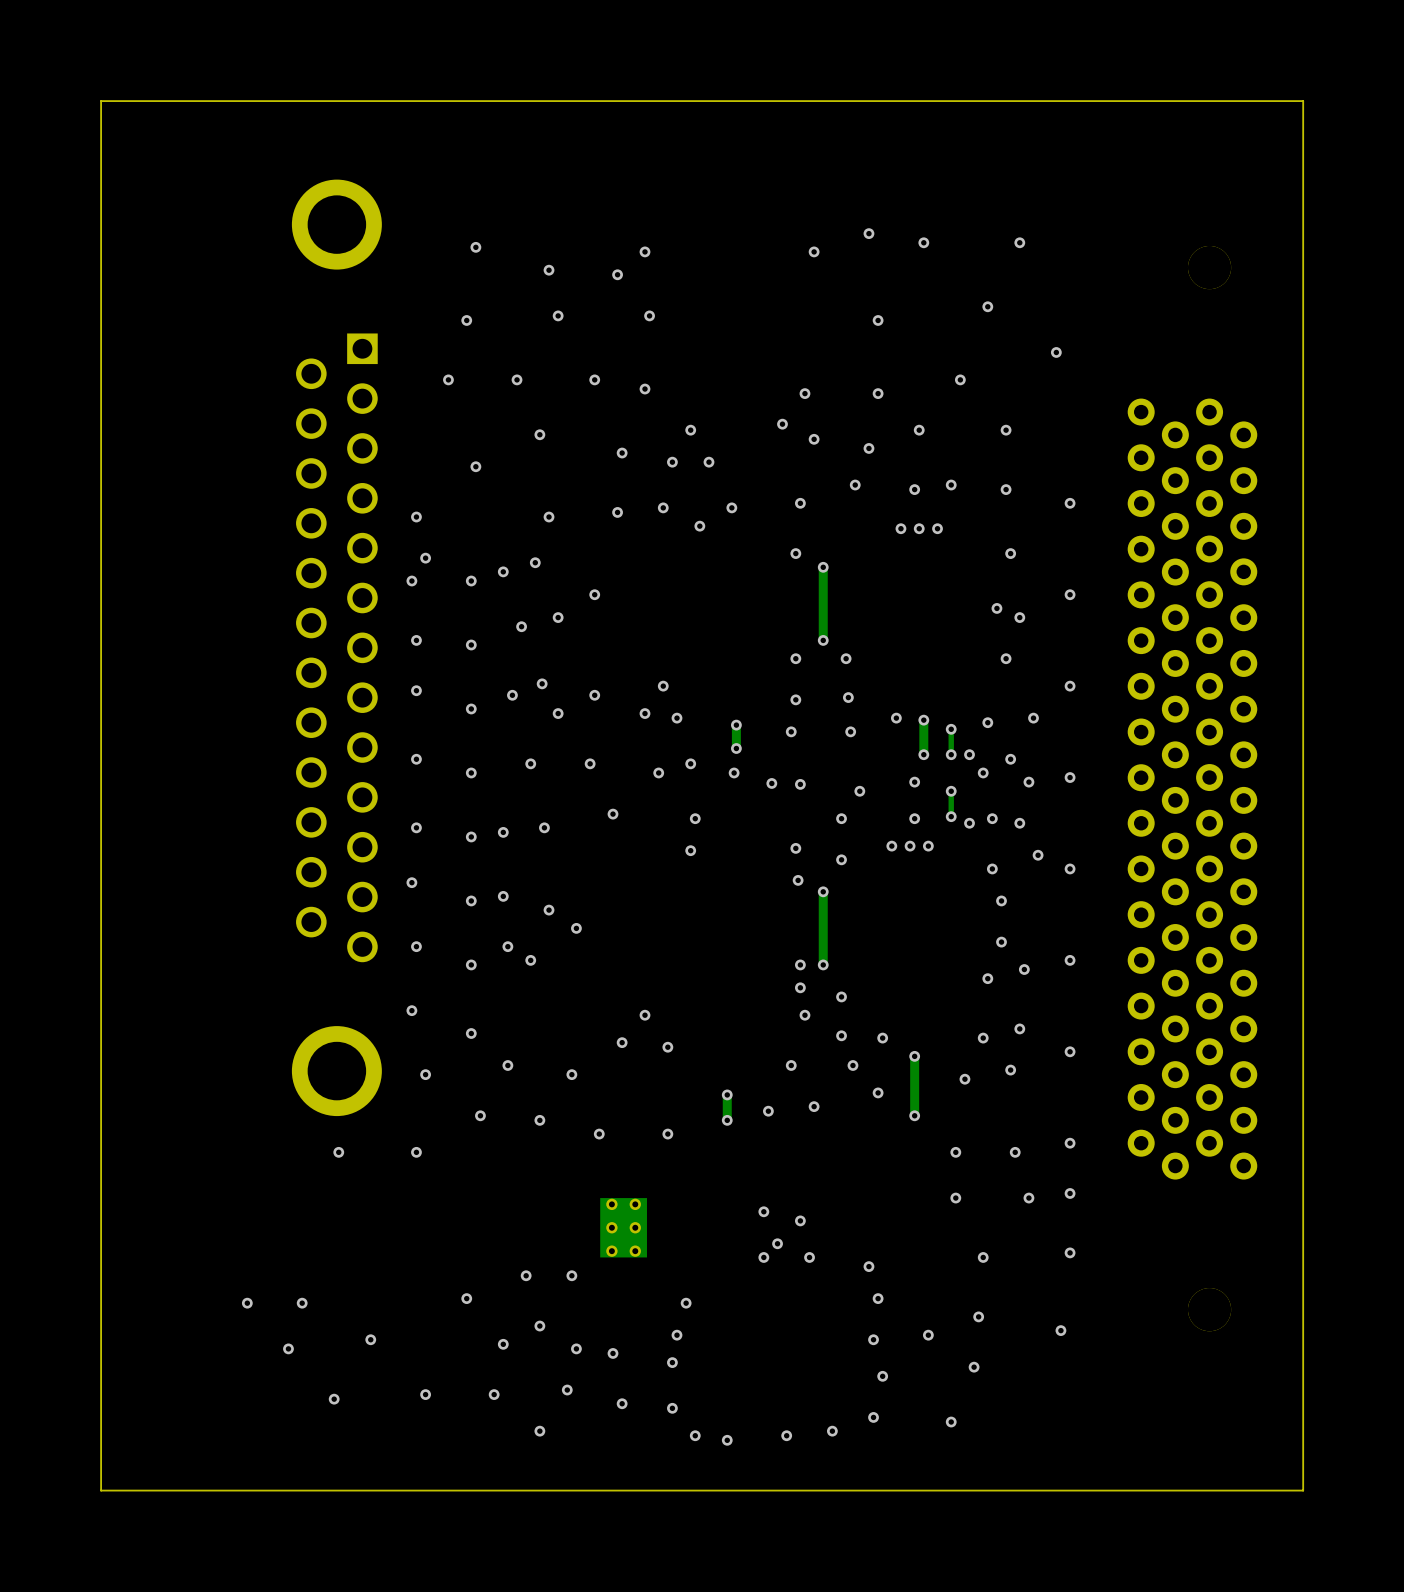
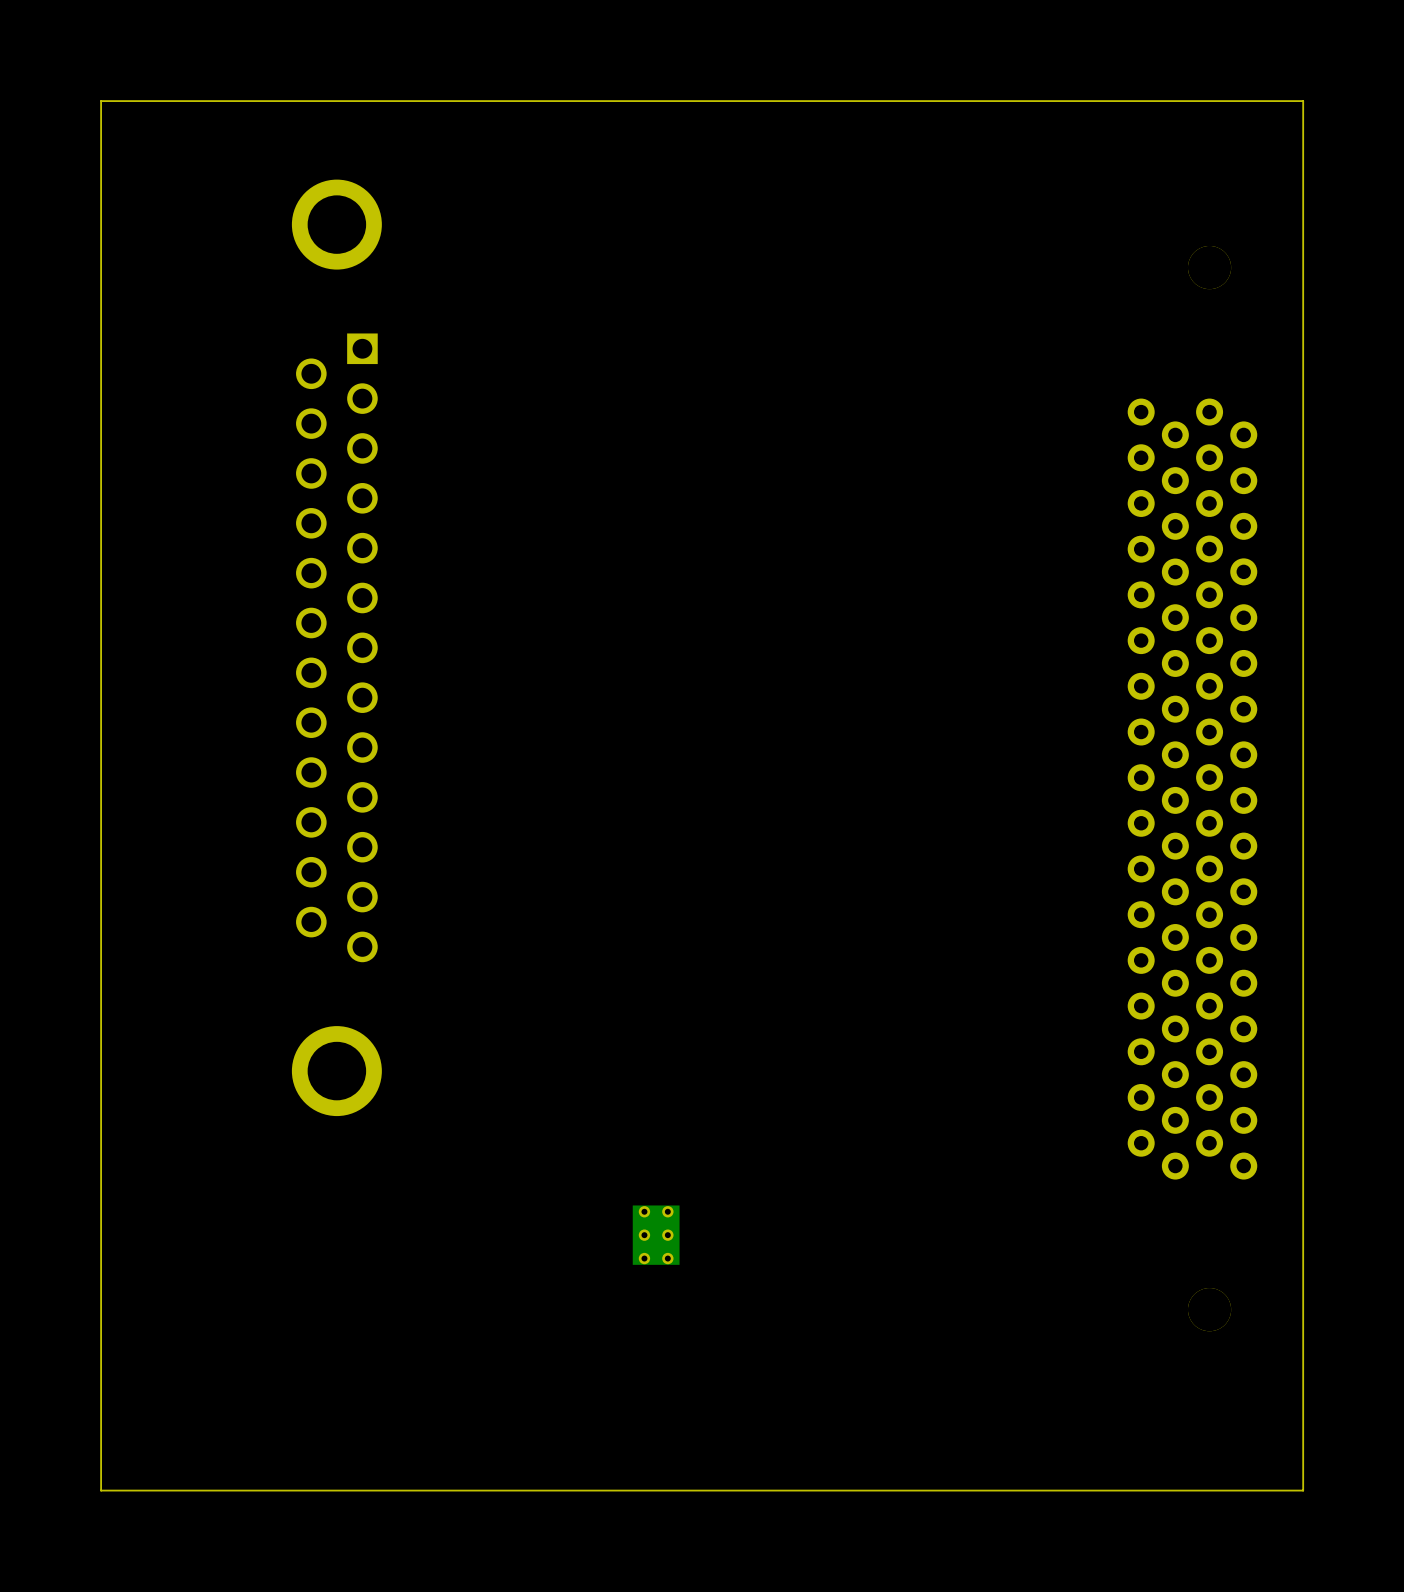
via: (868, 233) -> none
via: (923, 242) -> none
via: (1019, 242) -> none
via: (475, 247) -> none
via: (644, 251) -> none
via: (814, 251) -> none
via: (549, 270) -> none
via: (617, 274) -> none
via: (987, 306) -> none
via: (558, 315) -> none
via: (649, 315) -> none
via: (466, 320) -> none
via: (878, 320) -> none
via: (1056, 352) -> none
via: (448, 379) -> none
via: (517, 379) -> none
via: (594, 379) -> none
via: (960, 379) -> none
via: (644, 389) -> none
via: (804, 393) -> none
via: (878, 393) -> none
via: (782, 424) -> none
via: (690, 430) -> none
via: (919, 430) -> none
via: (1006, 430) -> none
via: (539, 434) -> none
via: (814, 439) -> none
via: (868, 448) -> none
via: (622, 453) -> none
via: (672, 462) -> none
via: (708, 462) -> none
via: (475, 466) -> none
via: (855, 485) -> none
via: (951, 485) -> none
via: (914, 489) -> none
via: (1006, 489) -> none
via: (800, 503) -> none
via: (1070, 503) -> none
via: (663, 507) -> none
via: (731, 507) -> none
via: (617, 512) -> none
via: (416, 517) -> none
via: (549, 517) -> none
via: (699, 526) -> none
via: (900, 528) -> none
via: (919, 528) -> none
via: (937, 528) -> none
via: (795, 553) -> none
via: (1010, 553) -> none
via: (425, 558) -> none
via: (535, 562) -> none
track: (823, 567) (823, 640) -> none
via: (823, 567) -> none
via: (503, 571) -> none
via: (411, 581) -> none
via: (471, 581) -> none
via: (594, 594) -> none
via: (1070, 594) -> none
via: (996, 608) -> none
via: (558, 617) -> none
via: (1019, 617) -> none
via: (521, 626) -> none
via: (416, 640) -> none
via: (823, 640) -> none
via: (471, 644) -> none
via: (795, 658) -> none
via: (846, 658) -> none
via: (1006, 658) -> none
via: (542, 683) -> none
via: (663, 686) -> none
via: (1070, 686) -> none
via: (416, 690) -> none
via: (512, 695) -> none
via: (594, 695) -> none
via: (848, 697) -> none
via: (795, 699) -> none
via: (471, 708) -> none
via: (558, 713) -> none
via: (644, 713) -> none
via: (676, 718) -> none
via: (896, 718) -> none
via: (1033, 718) -> none
track: (923, 720) (923, 754) -> none
via: (923, 720) -> none
via: (987, 722) -> none
track: (736, 725) (736, 748) -> none
via: (736, 725) -> none
track: (951, 729) (951, 754) -> none
via: (951, 729) -> none
via: (791, 731) -> none
via: (850, 731) -> none
via: (736, 748) -> none
via: (923, 754) -> none
via: (951, 754) -> none
via: (969, 754) -> none
via: (416, 759) -> none
via: (1010, 759) -> none
via: (530, 763) -> none
via: (590, 763) -> none
via: (690, 763) -> none
via: (471, 772) -> none
via: (658, 772) -> none
via: (734, 772) -> none
via: (983, 772) -> none
via: (1070, 777) -> none
via: (914, 782) -> none
via: (1028, 782) -> none
via: (771, 783) -> none
via: (800, 784) -> none
via: (859, 791) -> none
track: (951, 791) (951, 816) -> none
via: (951, 791) -> none
via: (613, 814) -> none
via: (951, 816) -> none
via: (695, 818) -> none
via: (841, 818) -> none
via: (914, 818) -> none
via: (992, 818) -> none
via: (969, 823) -> none
via: (1019, 823) -> none
via: (416, 827) -> none
via: (544, 827) -> none
via: (503, 832) -> none
via: (471, 836) -> none
via: (891, 846) -> none
via: (910, 846) -> none
via: (928, 846) -> none
via: (795, 848) -> none
via: (690, 850) -> none
via: (1038, 855) -> none
via: (841, 859) -> none
via: (992, 868) -> none
via: (1070, 868) -> none
via: (798, 880) -> none
via: (411, 882) -> none
track: (823, 891) (823, 964) -> none
via: (823, 891) -> none
via: (503, 896) -> none
via: (471, 900) -> none
via: (1001, 900) -> none
via: (549, 910) -> none
via: (576, 928) -> none
via: (1001, 942) -> none
via: (416, 946) -> none
via: (507, 946) -> none
via: (530, 960) -> none
via: (1070, 960) -> none
via: (471, 964) -> none
via: (800, 964) -> none
via: (823, 964) -> none
via: (1024, 969) -> none
via: (987, 978) -> none
via: (800, 987) -> none
via: (841, 996) -> none
via: (411, 1010) -> none
via: (644, 1015) -> none
via: (804, 1015) -> none
via: (1019, 1028) -> none
via: (471, 1033) -> none
via: (841, 1035) -> none
via: (882, 1038) -> none
via: (983, 1038) -> none
via: (622, 1042) -> none
via: (667, 1047) -> none
via: (1070, 1051) -> none
track: (914, 1056) (914, 1115) -> none
via: (914, 1056) -> none
via: (507, 1065) -> none
via: (791, 1065) -> none
via: (852, 1065) -> none
via: (1010, 1070) -> none
via: (425, 1074) -> none
via: (571, 1074) -> none
via: (964, 1079) -> none
via: (878, 1092) -> none
track: (727, 1094) (727, 1120) -> none
via: (727, 1094) -> none
via: (814, 1106) -> none
via: (768, 1111) -> none
via: (480, 1115) -> none
via: (914, 1115) -> none
via: (539, 1120) -> none
via: (727, 1120) -> none
via: (599, 1134) -> none
via: (667, 1134) -> none
via: (1070, 1143) -> none
via: (338, 1152) -> none
via: (416, 1152) -> none
via: (955, 1152) -> none
via: (1015, 1152) -> none
via: (1070, 1193) -> none
via: (955, 1198) -> none
via: (1028, 1198) -> none
via: (763, 1211) -> none
via: (800, 1220) -> none
part position: (623, 1227) -> (656, 1235)
via: (777, 1243) -> none
via: (1070, 1252) -> none
via: (763, 1257) -> none
via: (809, 1257) -> none
via: (983, 1257) -> none
via: (868, 1266) -> none
via: (526, 1275) -> none
via: (571, 1275) -> none
via: (466, 1298) -> none
via: (878, 1298) -> none
via: (247, 1303) -> none
via: (302, 1303) -> none
via: (686, 1303) -> none
via: (978, 1316) -> none
via: (539, 1326) -> none
via: (1060, 1330) -> none
via: (676, 1335) -> none
via: (928, 1335) -> none
via: (370, 1339) -> none
via: (873, 1339) -> none
via: (503, 1344) -> none
via: (288, 1348) -> none
via: (576, 1348) -> none
via: (613, 1353) -> none
via: (672, 1362) -> none
via: (974, 1367) -> none
via: (882, 1376) -> none
via: (567, 1390) -> none
via: (425, 1394) -> none
via: (494, 1394) -> none
via: (334, 1399) -> none
via: (622, 1403) -> none
via: (672, 1408) -> none
via: (873, 1417) -> none
via: (951, 1422) -> none
via: (539, 1431) -> none
via: (832, 1431) -> none
via: (695, 1435) -> none
via: (786, 1435) -> none
via: (727, 1440) -> none

